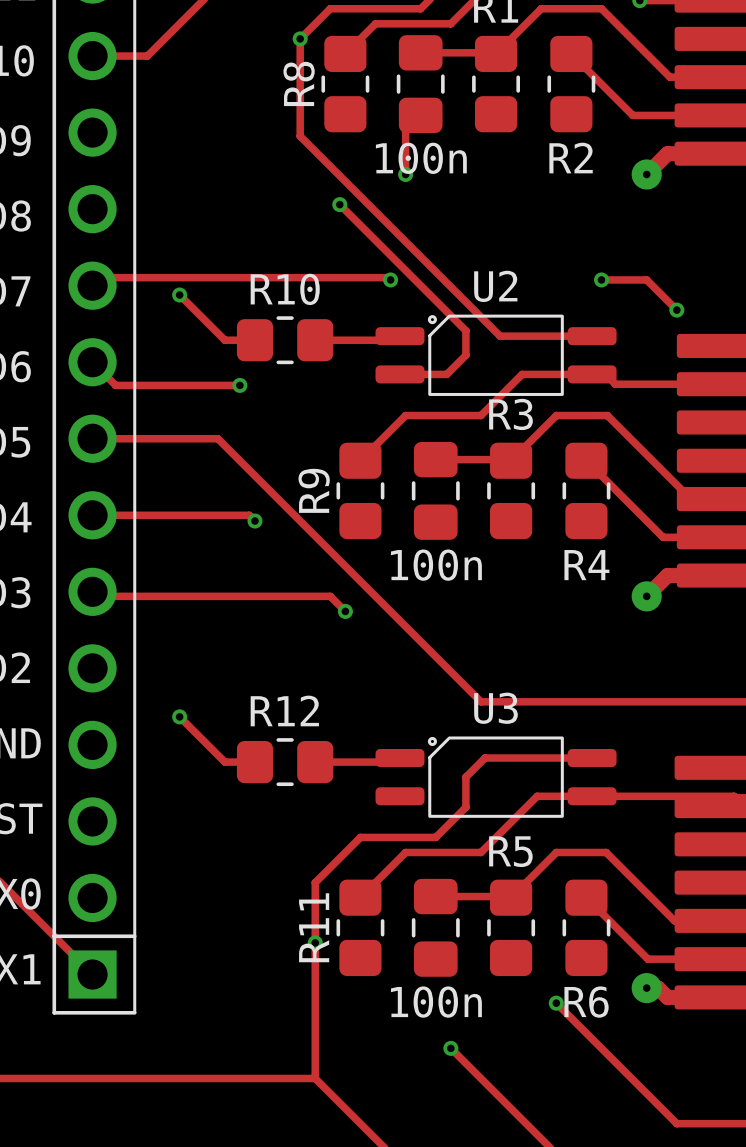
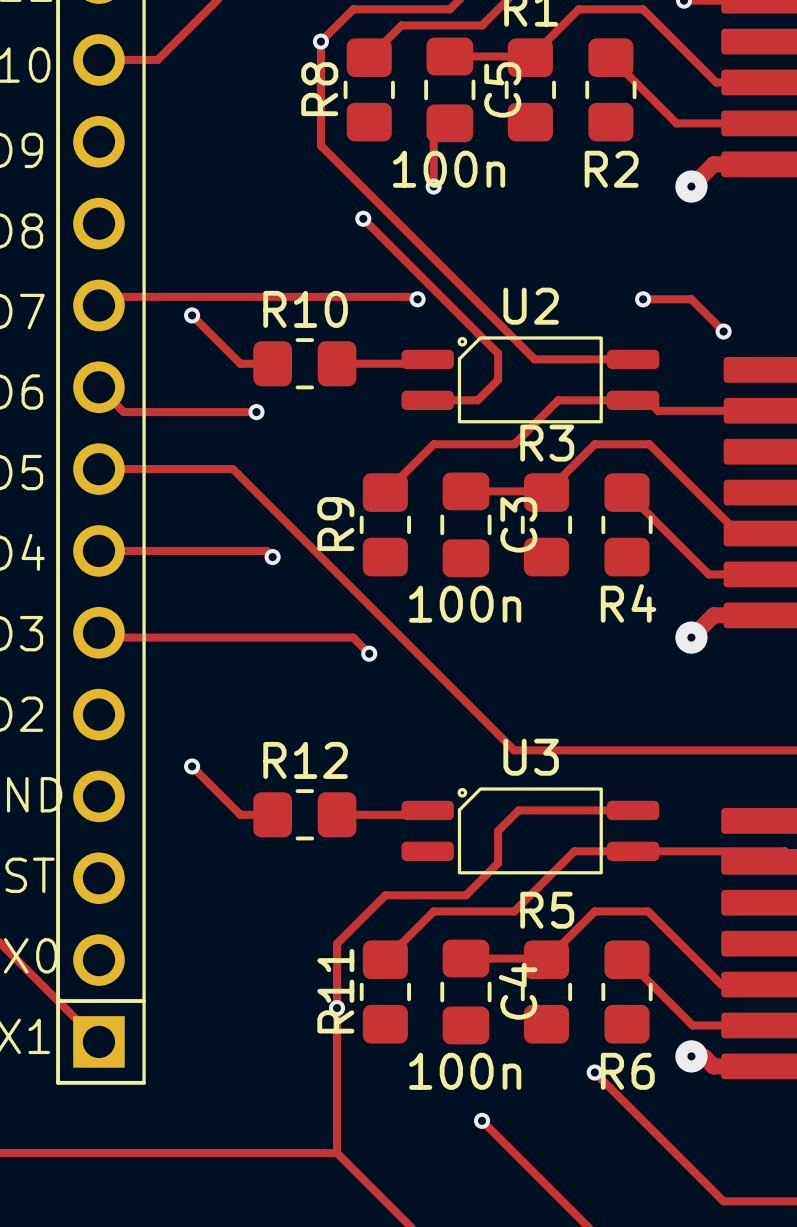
C5 name: none -> C5 (502, 89)
C3 name: none -> C3 (518, 524)
C4 name: none -> C4 (518, 991)

